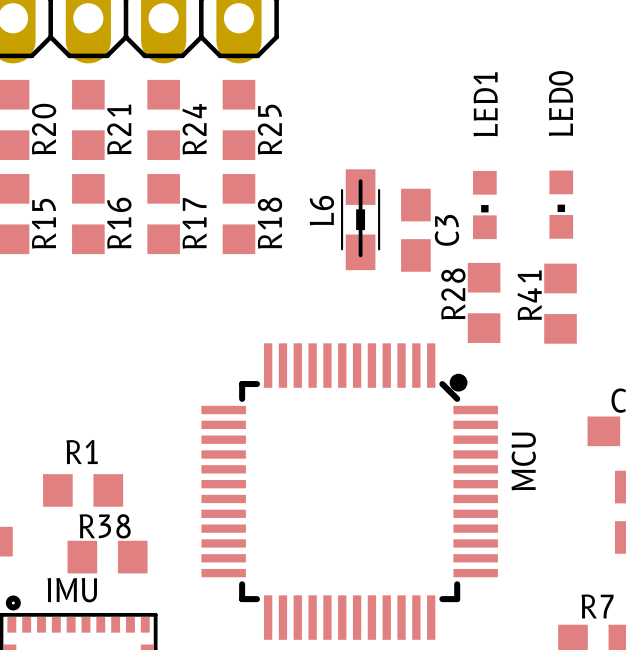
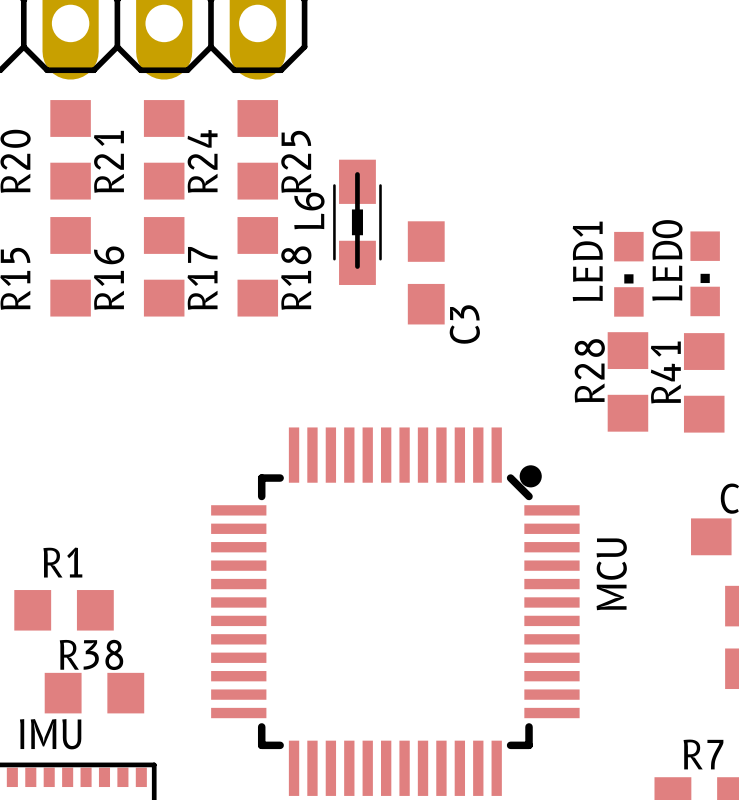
LED0 name position: LED0 (561, 103) -> LED0 (667, 260)
LED1 name position: LED1 (485, 104) -> LED1 (587, 261)
LED0 position: (561, 204) -> (705, 273)
LED1 position: (484, 205) -> (628, 274)
L6 position: (360, 219) -> (357, 222)
C3 position: (415, 230) -> (426, 272)
C3 name position: C3 (446, 230) -> C3 (464, 324)
R28 position: (484, 302) -> (627, 381)
R41 position: (560, 303) -> (704, 382)

